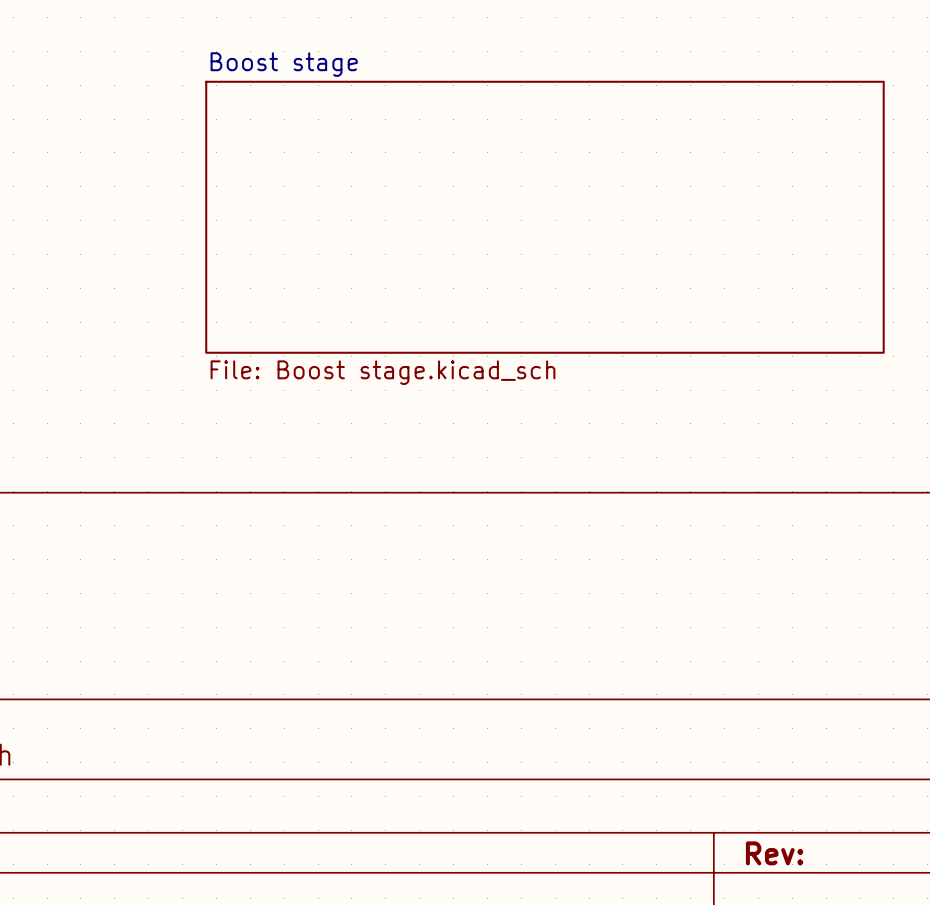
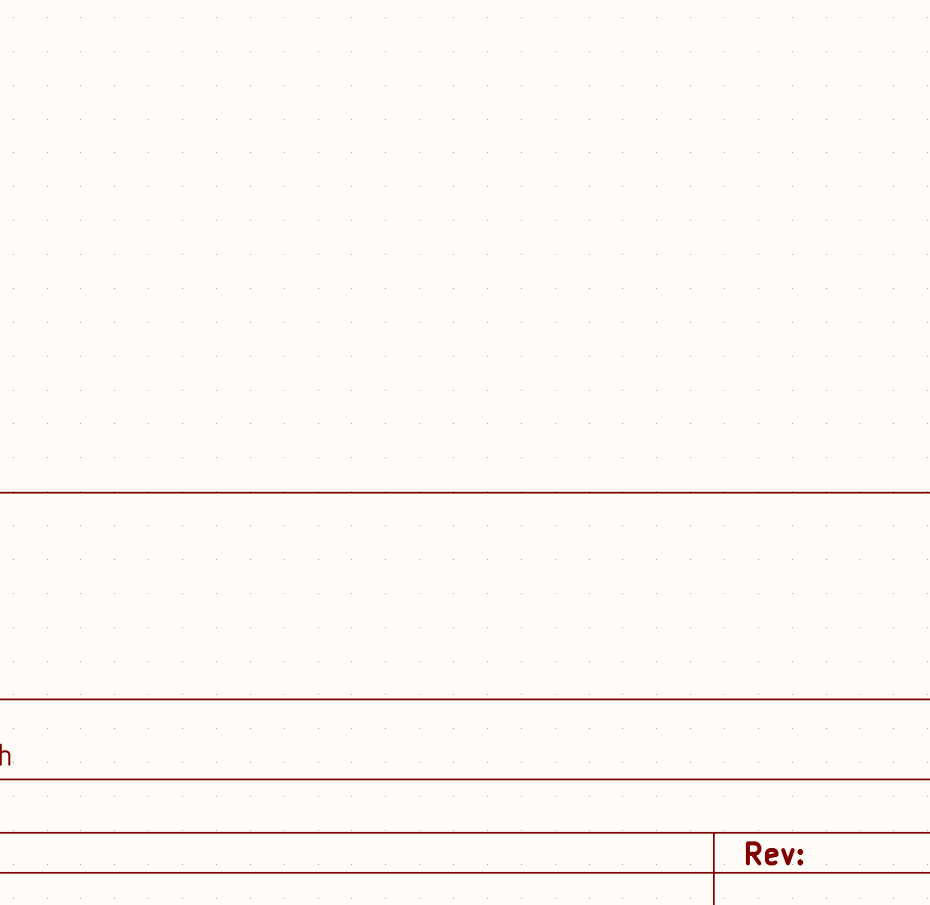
sheet Boost stage: File: Boost stage.kicad_sch (544, 217) -> none

